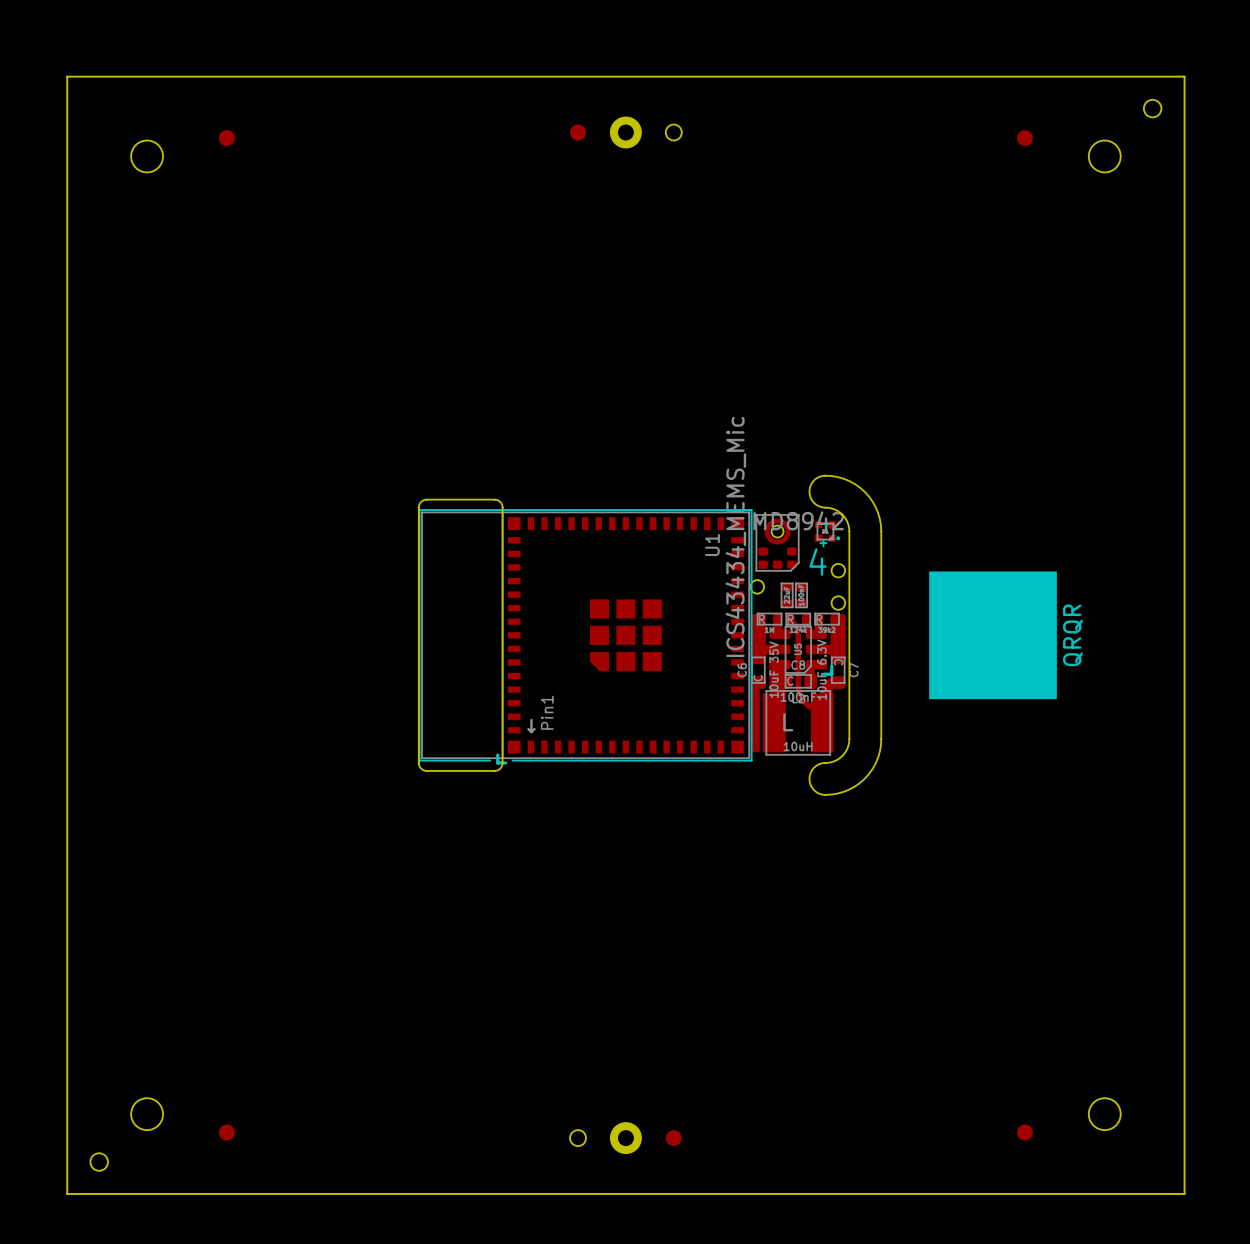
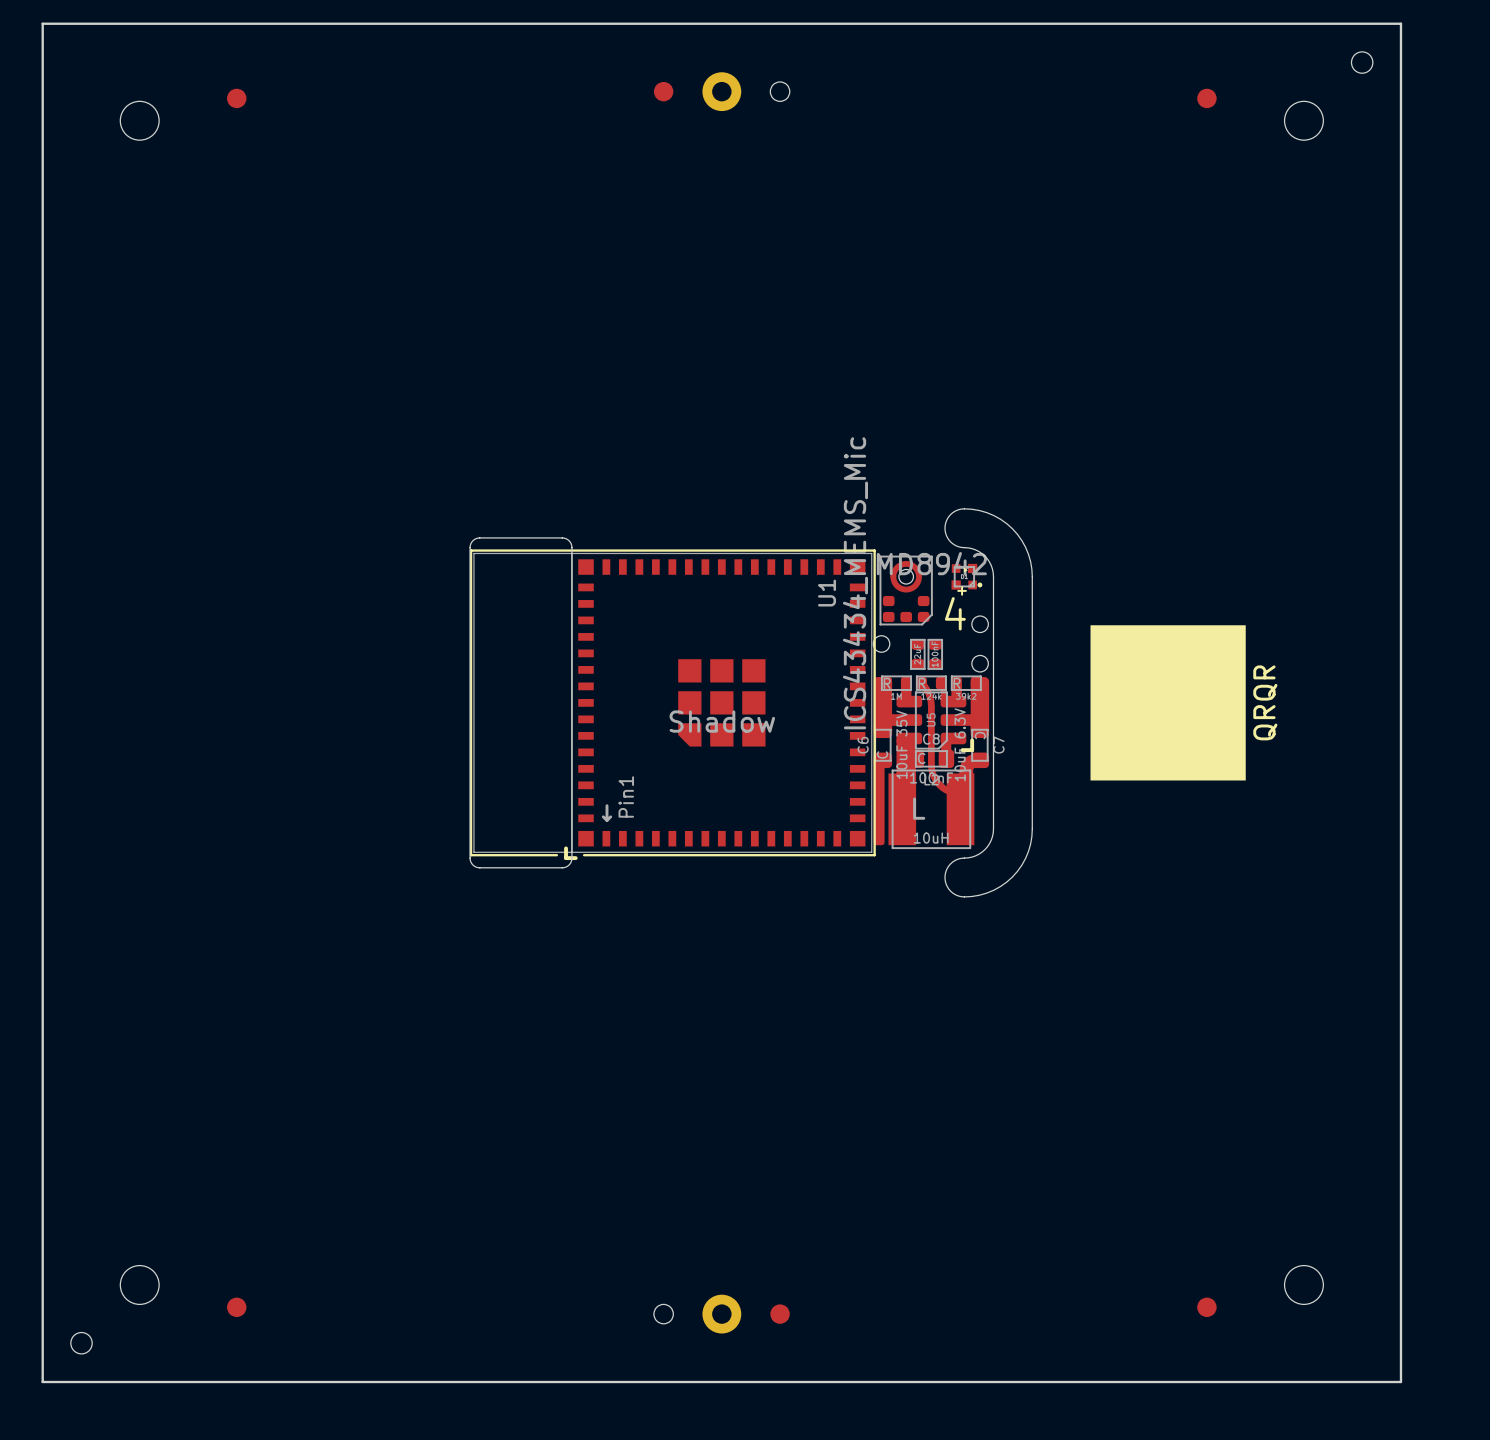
drawing: none -> [669, 710, 776, 733]

